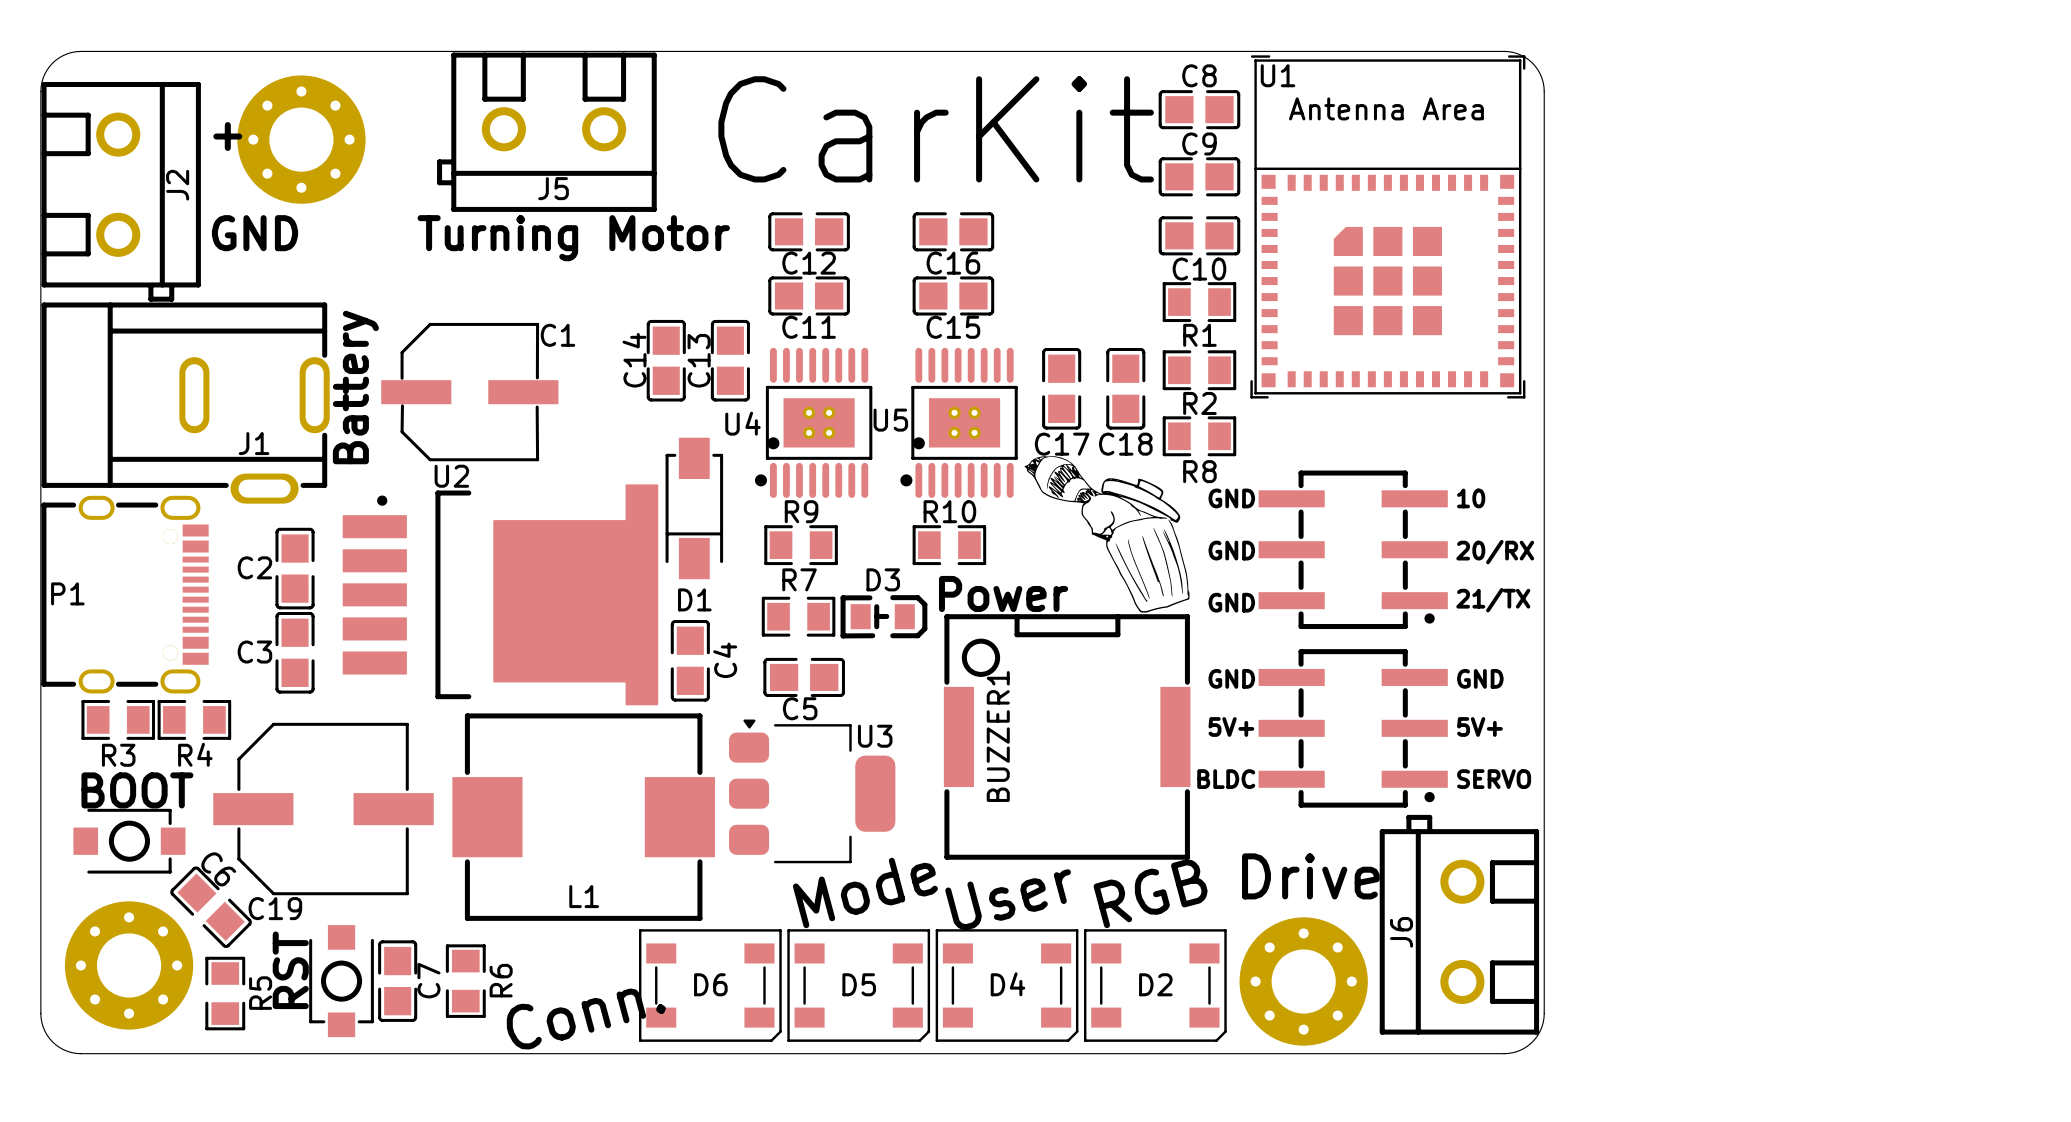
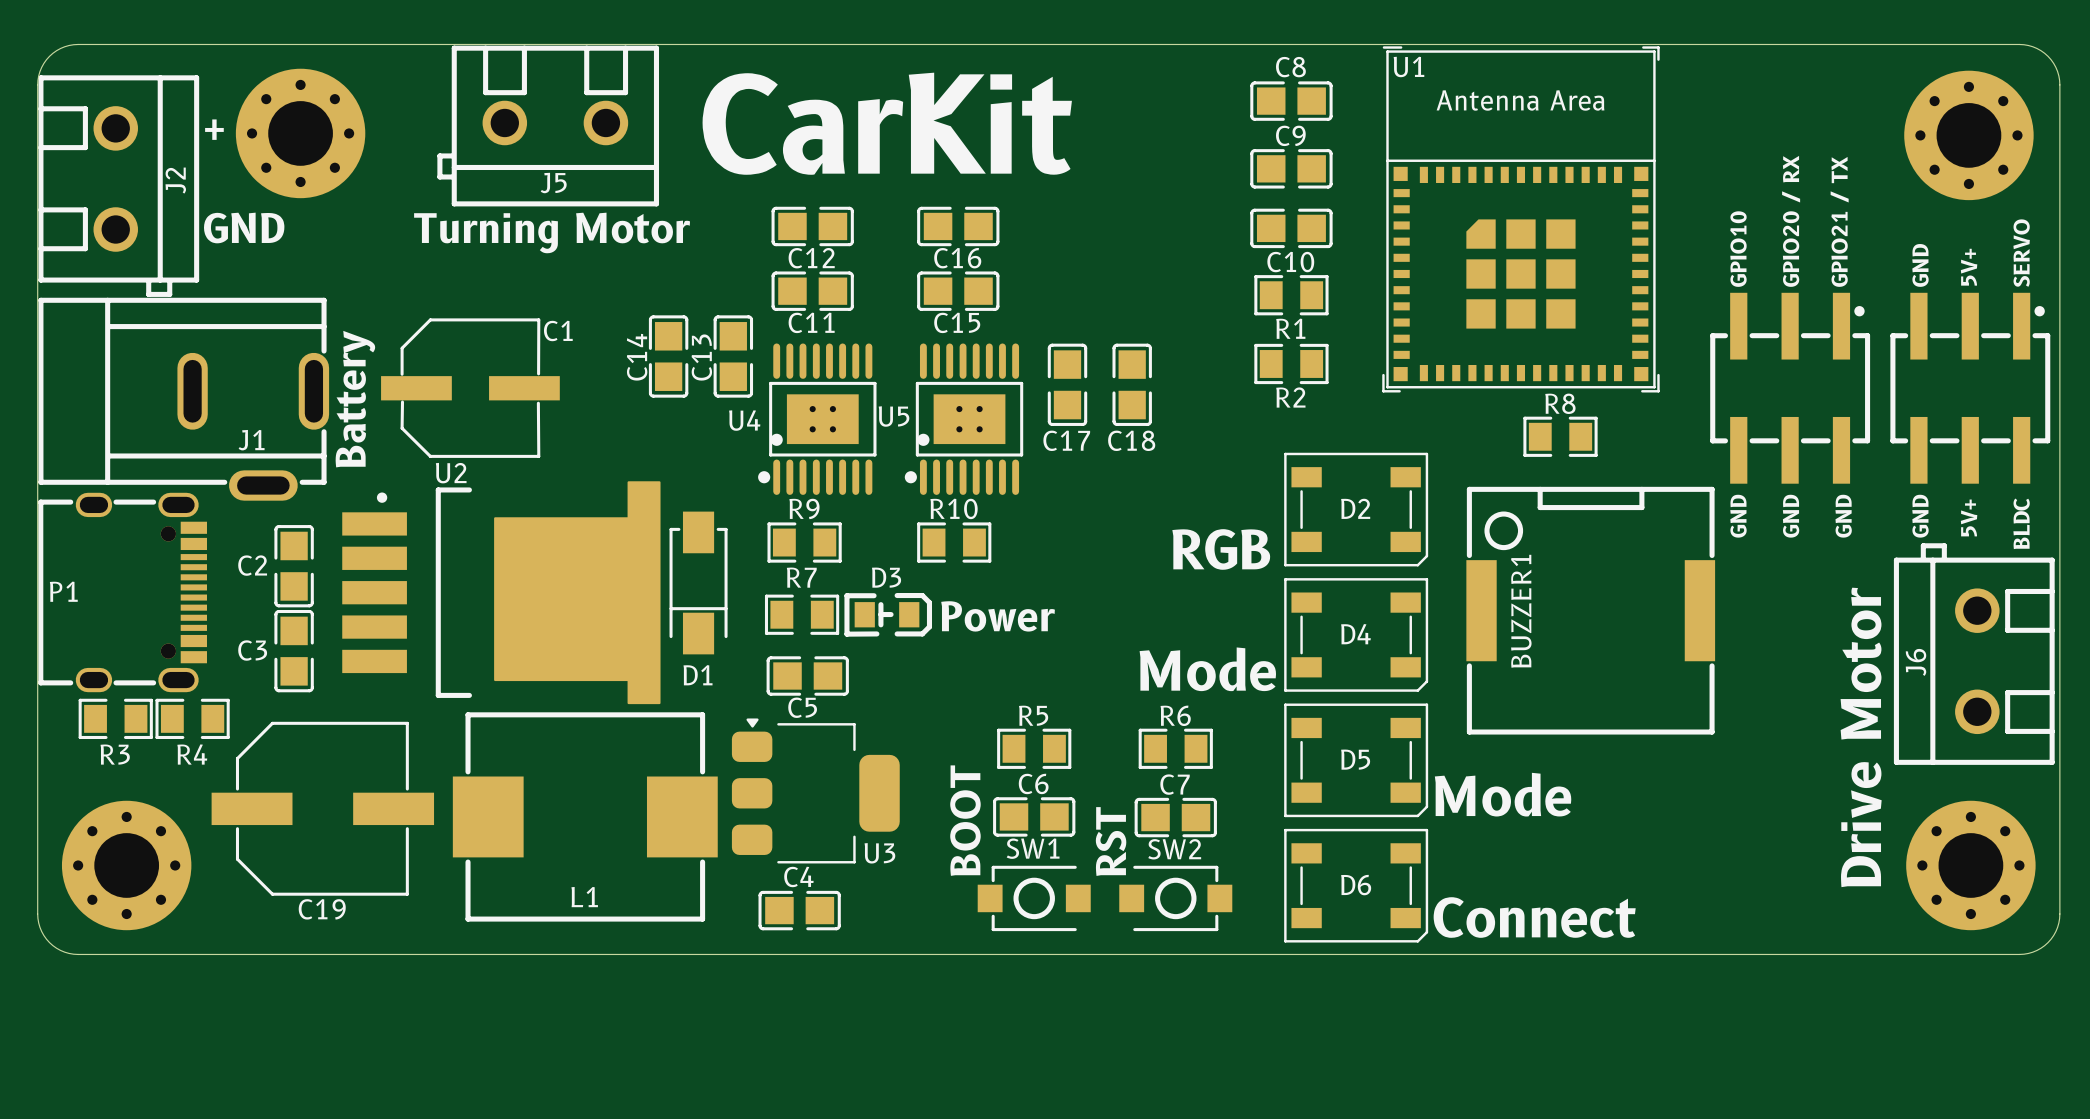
board edge: (1504, 51) (1521, 55) (1532, 63) (1540, 74) (1544, 91) (1544, 1013) (1540, 1030) (1532, 1041) (1525, 1047) (1513, 1052) (1504, 1053) (76, 1053) (67, 1051) (55, 1044) (47, 1034) (41, 1022) (40, 913) -> (1513, 44) (2019, 44) (2036, 48) (2044, 53) (2053, 63) (2057, 71) (2059, 84) (2059, 914) (2057, 927) (2053, 935) (2040, 948) (2028, 953) (2019, 954) (78, 954) (64, 952) (49, 942) (41, 931) (37, 914)
C8 position: (1199, 109) -> (1291, 101)
part: none -> (1968, 135)
C9 position: (1199, 176) -> (1291, 168)
text: none -> GPIO20 / RX (1791, 221)
text: none -> GPIO21 / TX (1839, 221)
U1 position: (1387, 226) -> (1520, 219)
C10 position: (1199, 235) -> (1291, 228)
text: none -> GPIO10 (1738, 249)
text: none -> SERVO (2021, 253)
text: none -> GND (1920, 265)
text: none -> 5V+ (1969, 267)
R1 position: (1199, 302) -> (1291, 295)
R2 position: (1199, 370) -> (1291, 363)
part: none -> (1790, 388)
part: none -> (1970, 388)
R8 position: (1199, 436) -> (1560, 436)
drawing: [1024, 455, 1190, 613] -> none
R8 name position: R8 (1199, 471) -> R8 (1560, 403)
text: GND (1231, 498) -> none
text: 10 (1471, 498) -> none
D1 position: (694, 508) -> (698, 582)
text: none -> GND (1738, 516)
text: none -> GND (1791, 516)
text: none -> GND (1843, 516)
text: none -> GND (1920, 516)
text: none -> 5V+ (1969, 517)
text: none -> BLDC (2021, 523)
part: (1353, 549) -> none
text: GND (1231, 550) -> none
text: 20/RX (1495, 552) -> none
text position: Power (1003, 593) -> Power (998, 616)
text: 21/TX (1493, 600) -> none
text: GND (1231, 602) -> none
C4 rotation: 0° (690, 660) -> 90° clockwise (799, 910)
C4 position: (690, 660) -> (799, 910)
C4 name position: C4 (725, 660) -> C4 (798, 876)
text: none -> Mode (1207, 669)
text: GND (1231, 678) -> none
text: GND (1480, 678) -> none
text: none -> Drive Motor (1861, 737)
text: 5V+ (1231, 726) -> none
text: 5V+ (1479, 726) -> none
part: (1353, 728) -> none
U3 name position: U3 (875, 736) -> U3 (879, 853)
BUZZER1 position: (1067, 736) -> (1590, 610)
text: BLDC (1226, 779) -> none
text: SERVO (1494, 779) -> none
text: BOOT (137, 790) -> none
text: none -> Mode (1503, 794)
text: none -> BOOT (965, 820)
text: none -> RST (1111, 841)
part: (129, 841) -> none
part: none -> (1970, 865)
C6 footprint: [170, 866, 252, 949] -> [993, 797, 1076, 837]
text: Drive (1310, 876) -> none
text: Mode (865, 892) -> none
text rotation: 0° (1150, 893) -> 15° clockwise (1221, 549)
text position: RGB (1150, 893) -> RGB (1221, 549)
SW1: none -> (1034, 898)
SW2: none -> (1175, 898)
text: User (1008, 899) -> none
C19 name position: C19 (275, 908) -> C19 (322, 909)
text: none -> Connect (1534, 917)
J6 position: (1459, 924) -> (1974, 654)
part position: (129, 965) -> (126, 865)
text: RST (290, 970) -> none
C7 name position: C7 (428, 980) -> C7 (1175, 784)
R6 name position: R6 (501, 980) -> R6 (1175, 715)
part: (341, 981) -> none
C7 rotation: 0° (397, 981) -> 90° clockwise (1175, 817)
C7 position: (397, 981) -> (1175, 817)
R6 rotation: 0° (465, 981) -> 90° clockwise (1175, 748)
R6 position: (465, 981) -> (1175, 748)
part: (1303, 981) -> none
D6 position: (710, 985) -> (1356, 885)
D5 position: (858, 985) -> (1356, 760)
D4 position: (1007, 985) -> (1356, 634)
D2 position: (1155, 985) -> (1356, 509)
R5 rotation: 0° (225, 993) -> 90° clockwise (1034, 748)
R5 position: (225, 993) -> (1034, 748)
R5 name position: R5 (260, 993) -> R5 (1033, 715)
text: Conn. (586, 1019) -> none

